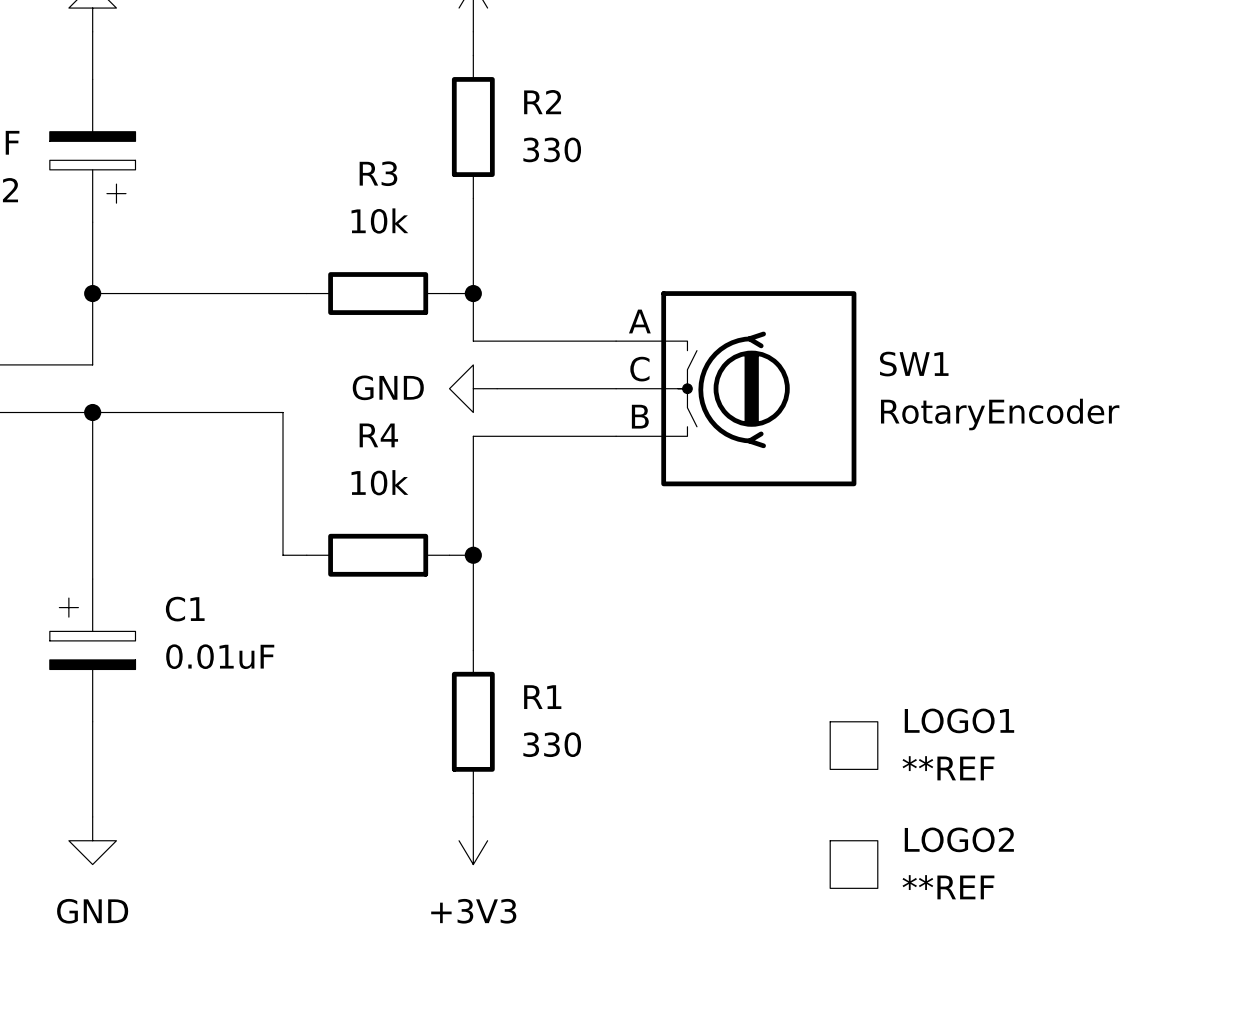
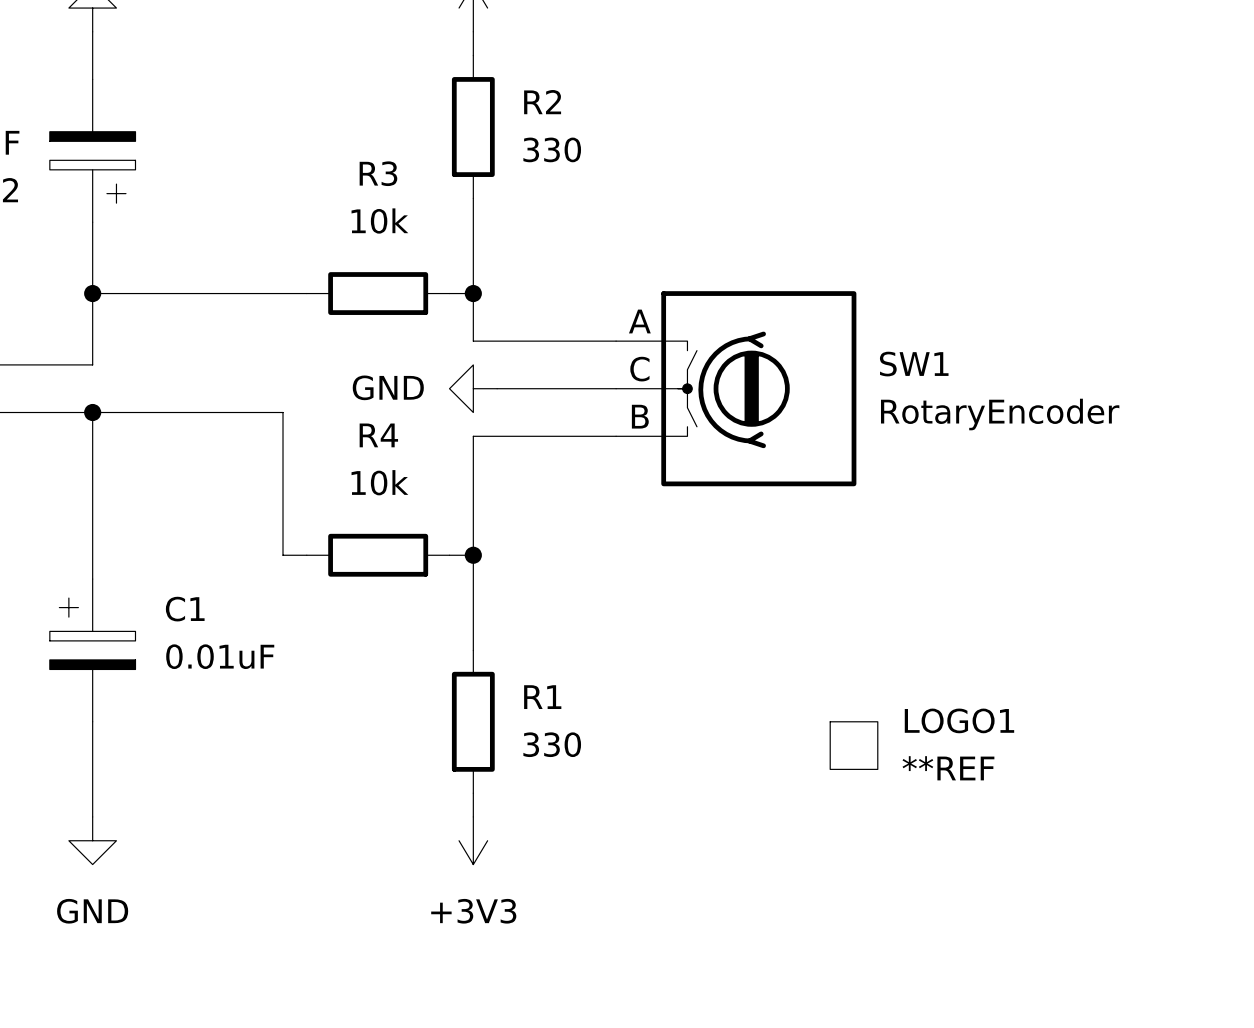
LOGO2: **REF (853, 864) -> none

